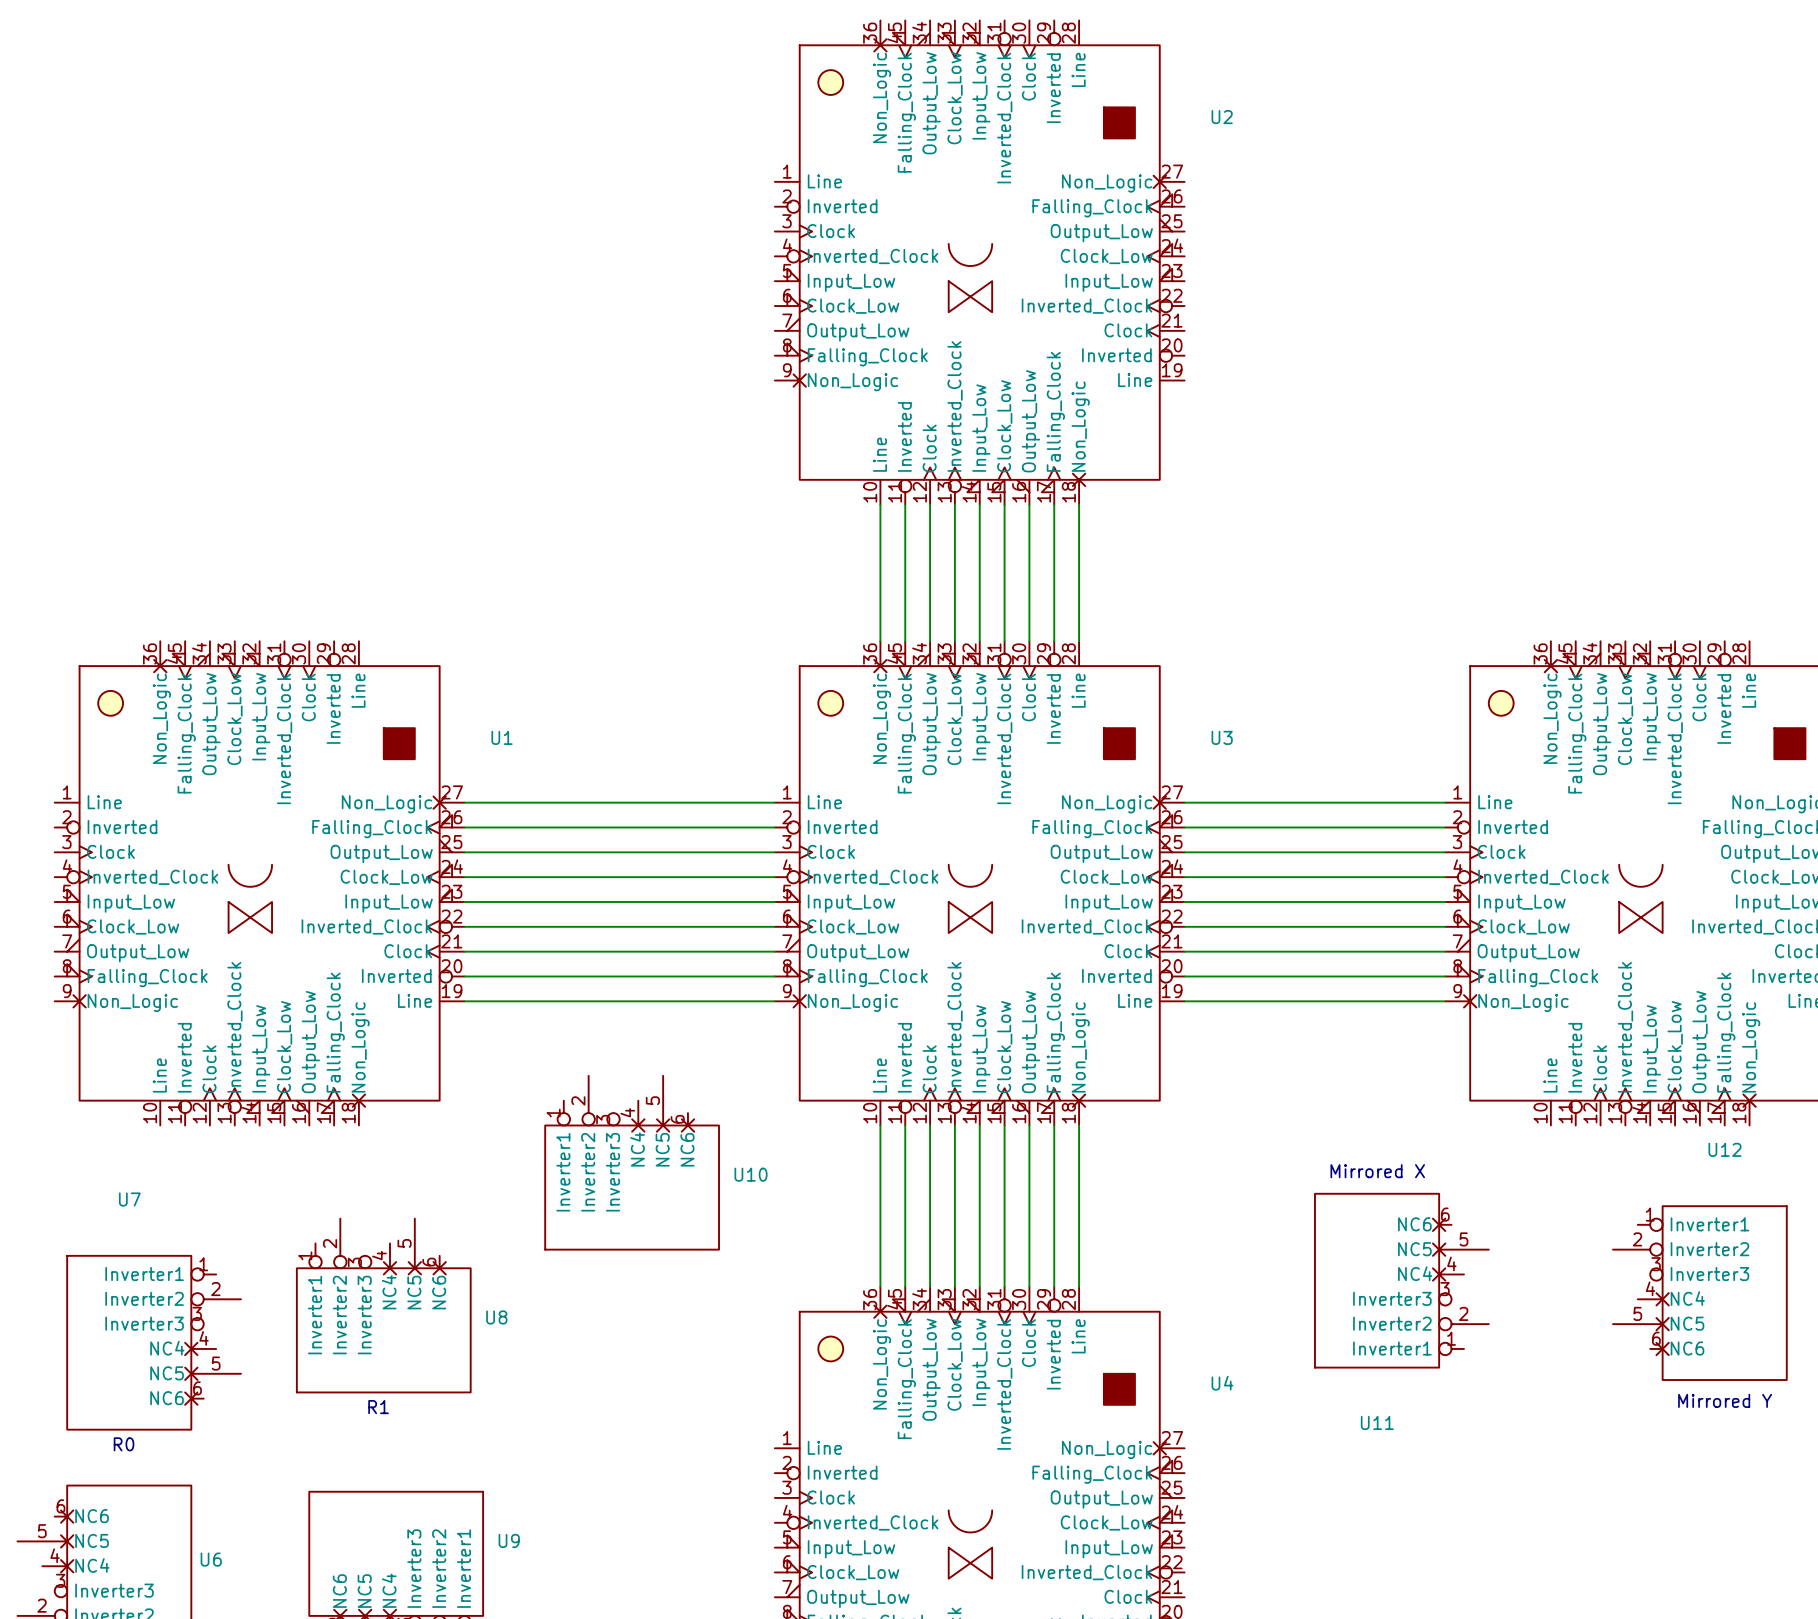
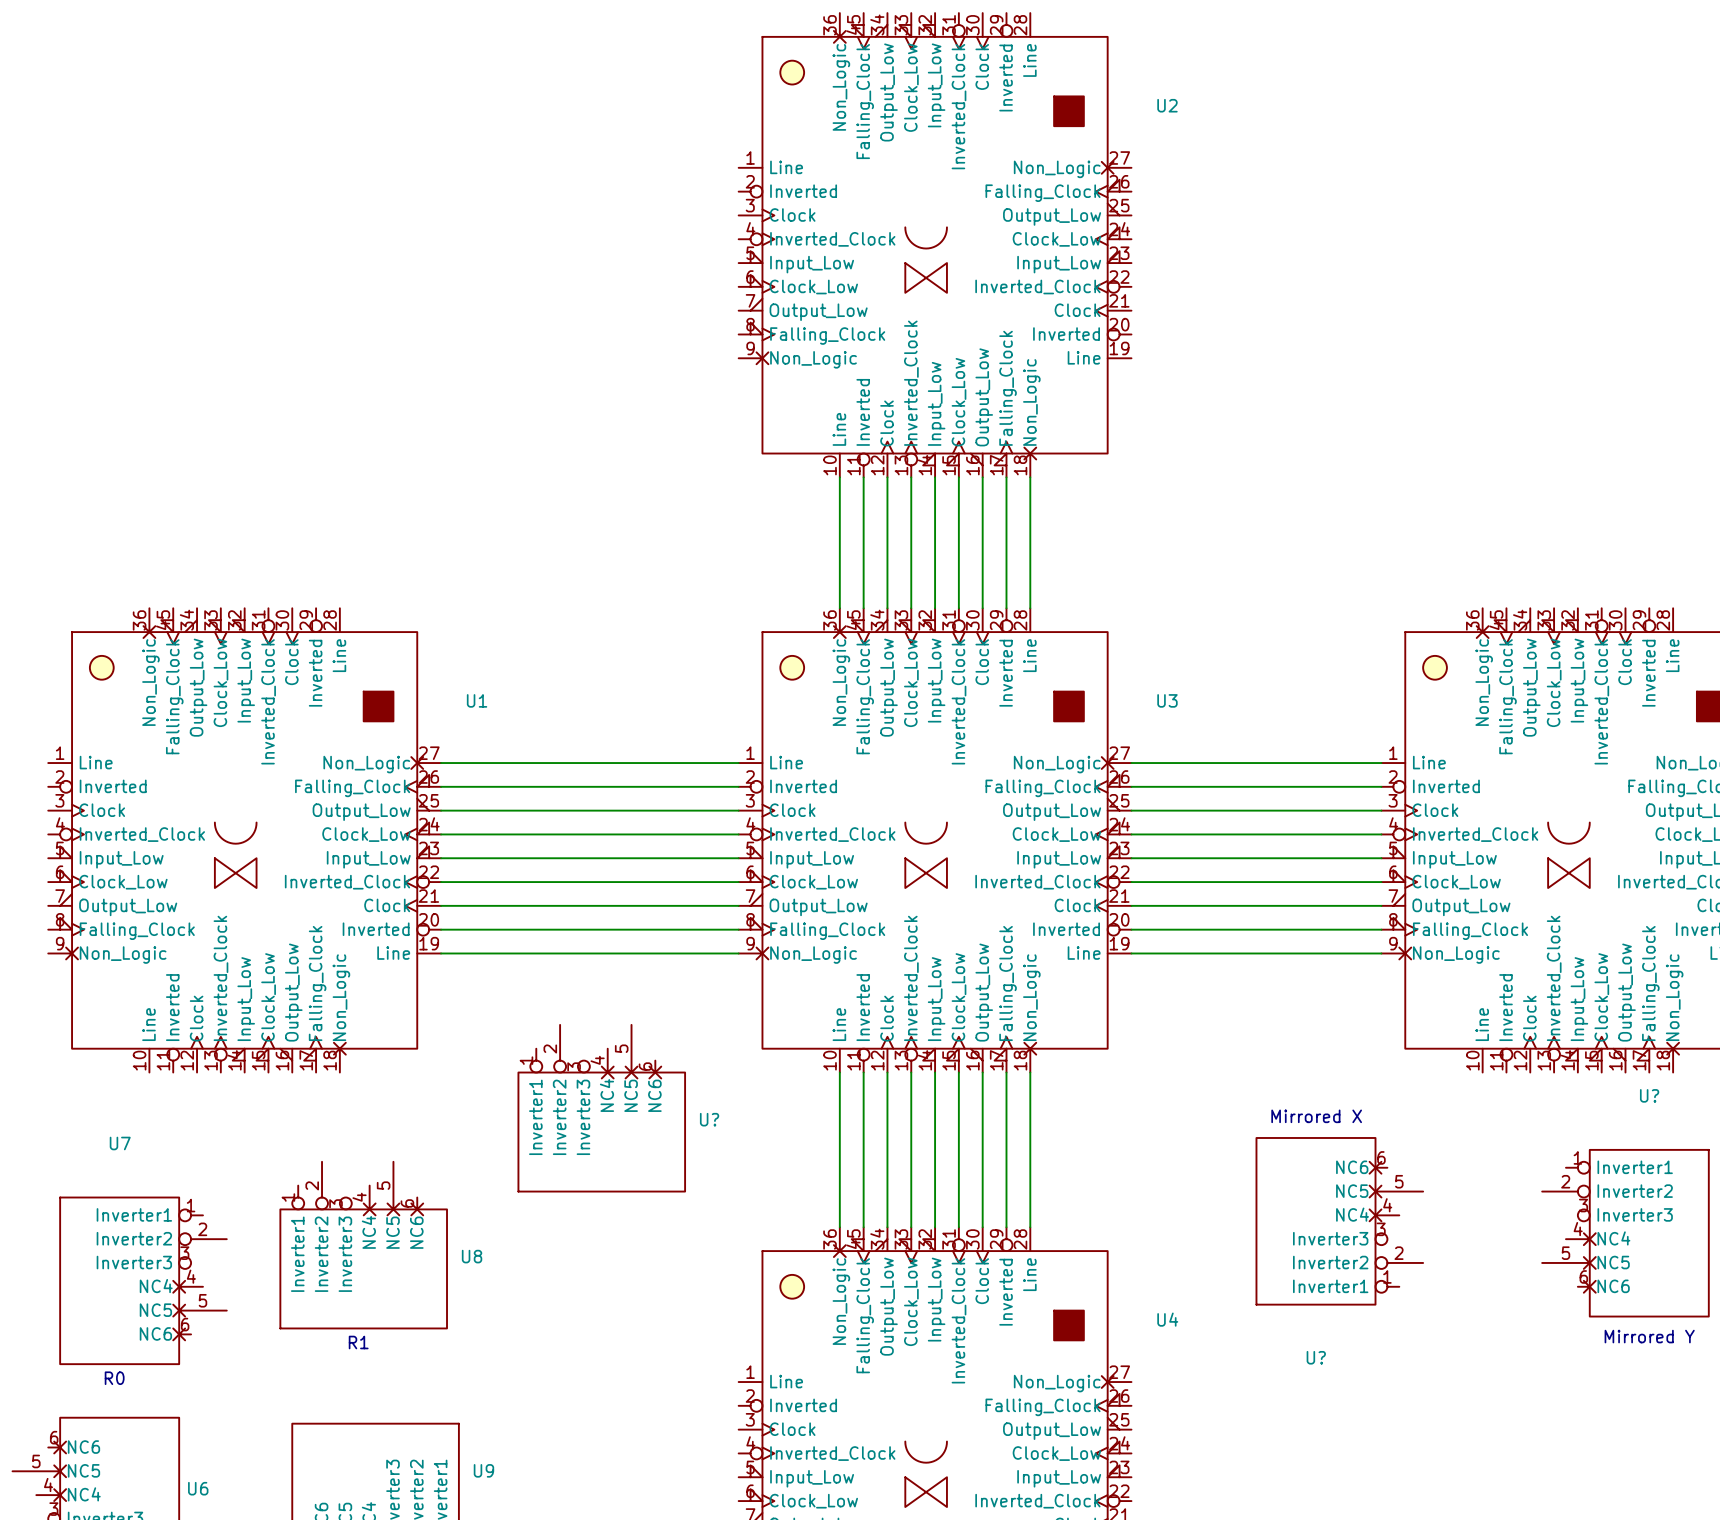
U12 name: U12 (1725, 1149) -> U? (1649, 1095)
U10 name: U10 (751, 1174) -> U? (709, 1119)
U11 name: U11 (1377, 1423) -> U? (1316, 1357)

